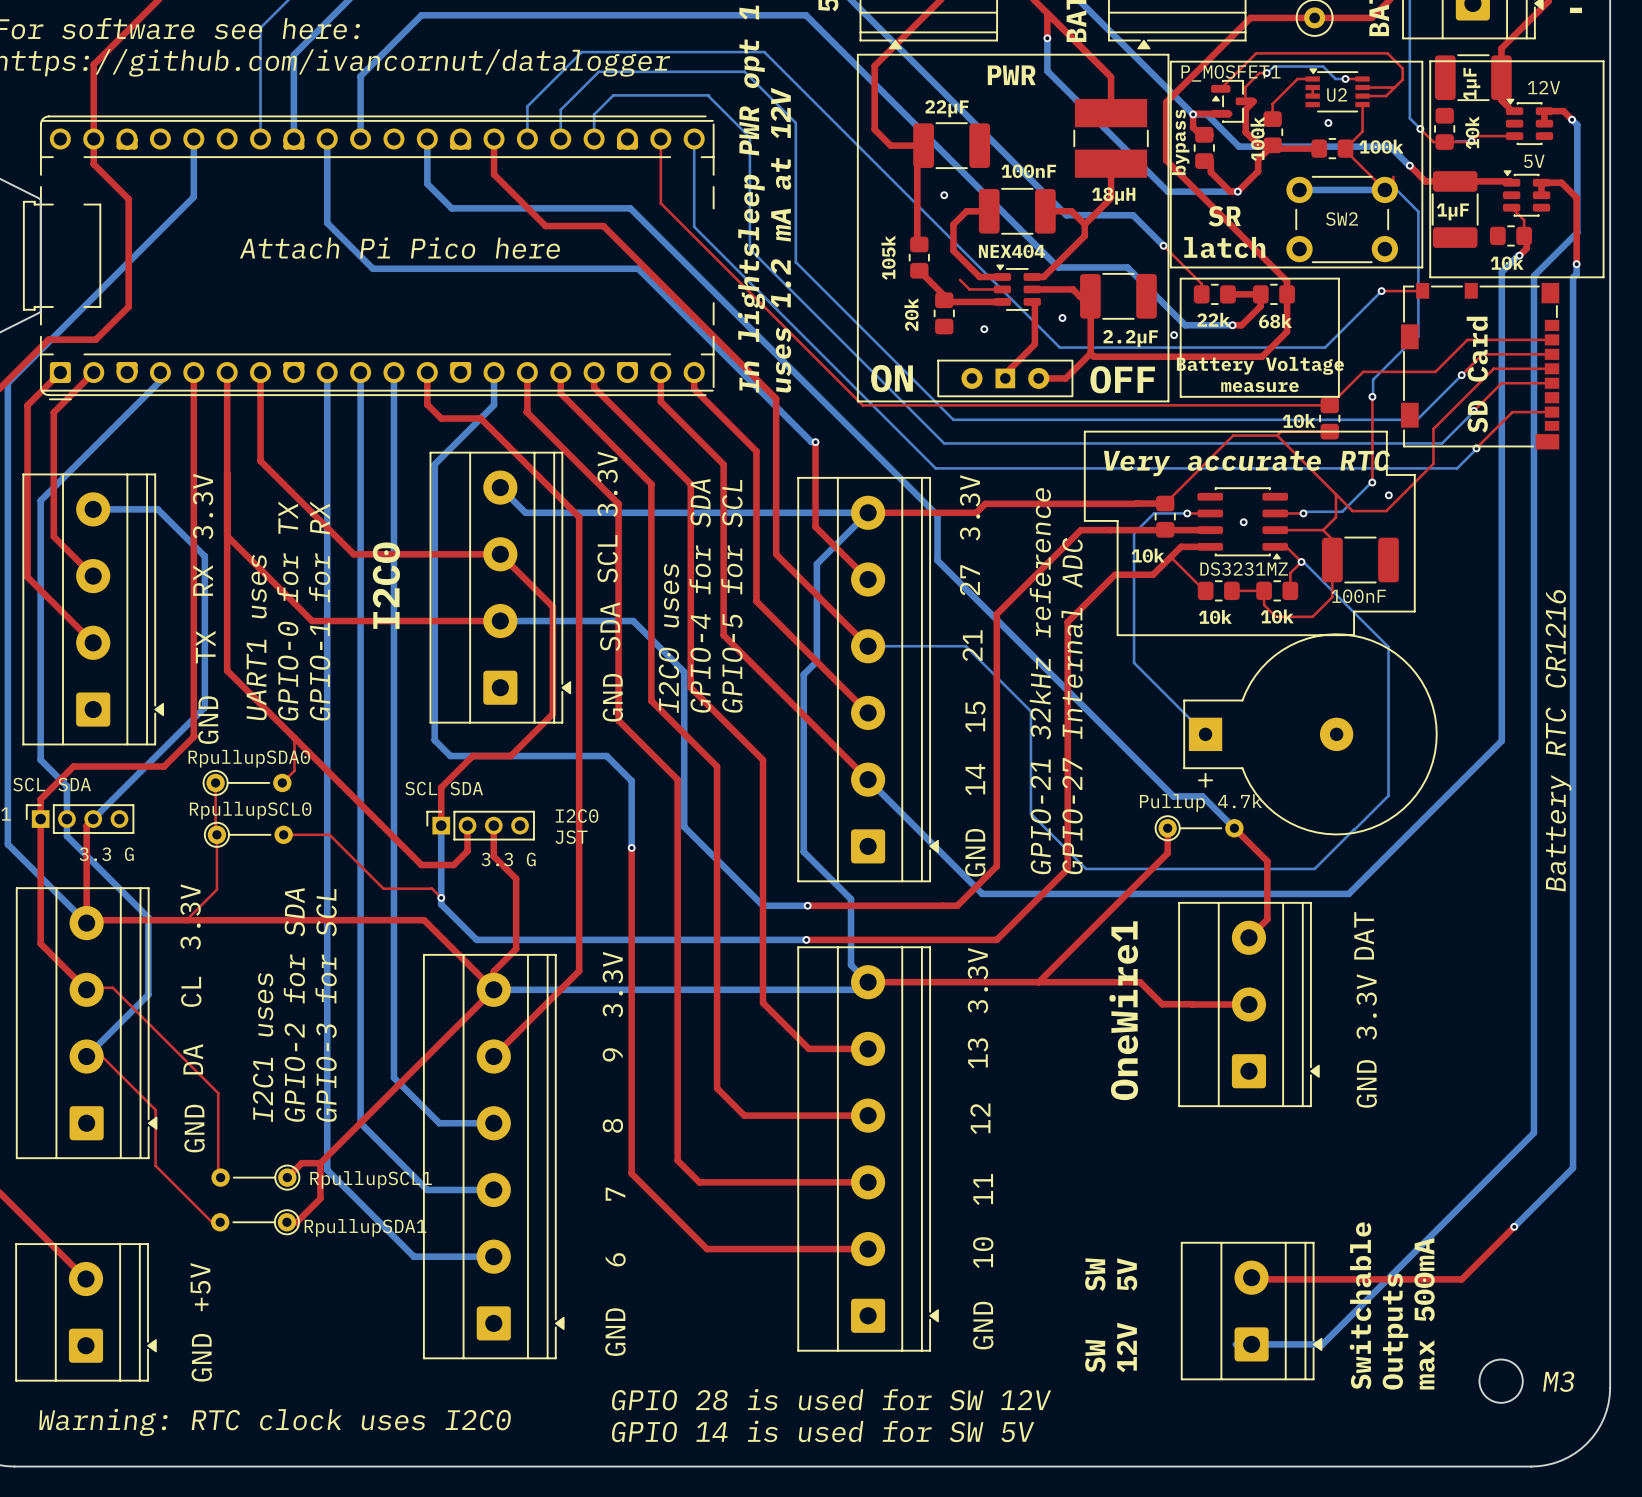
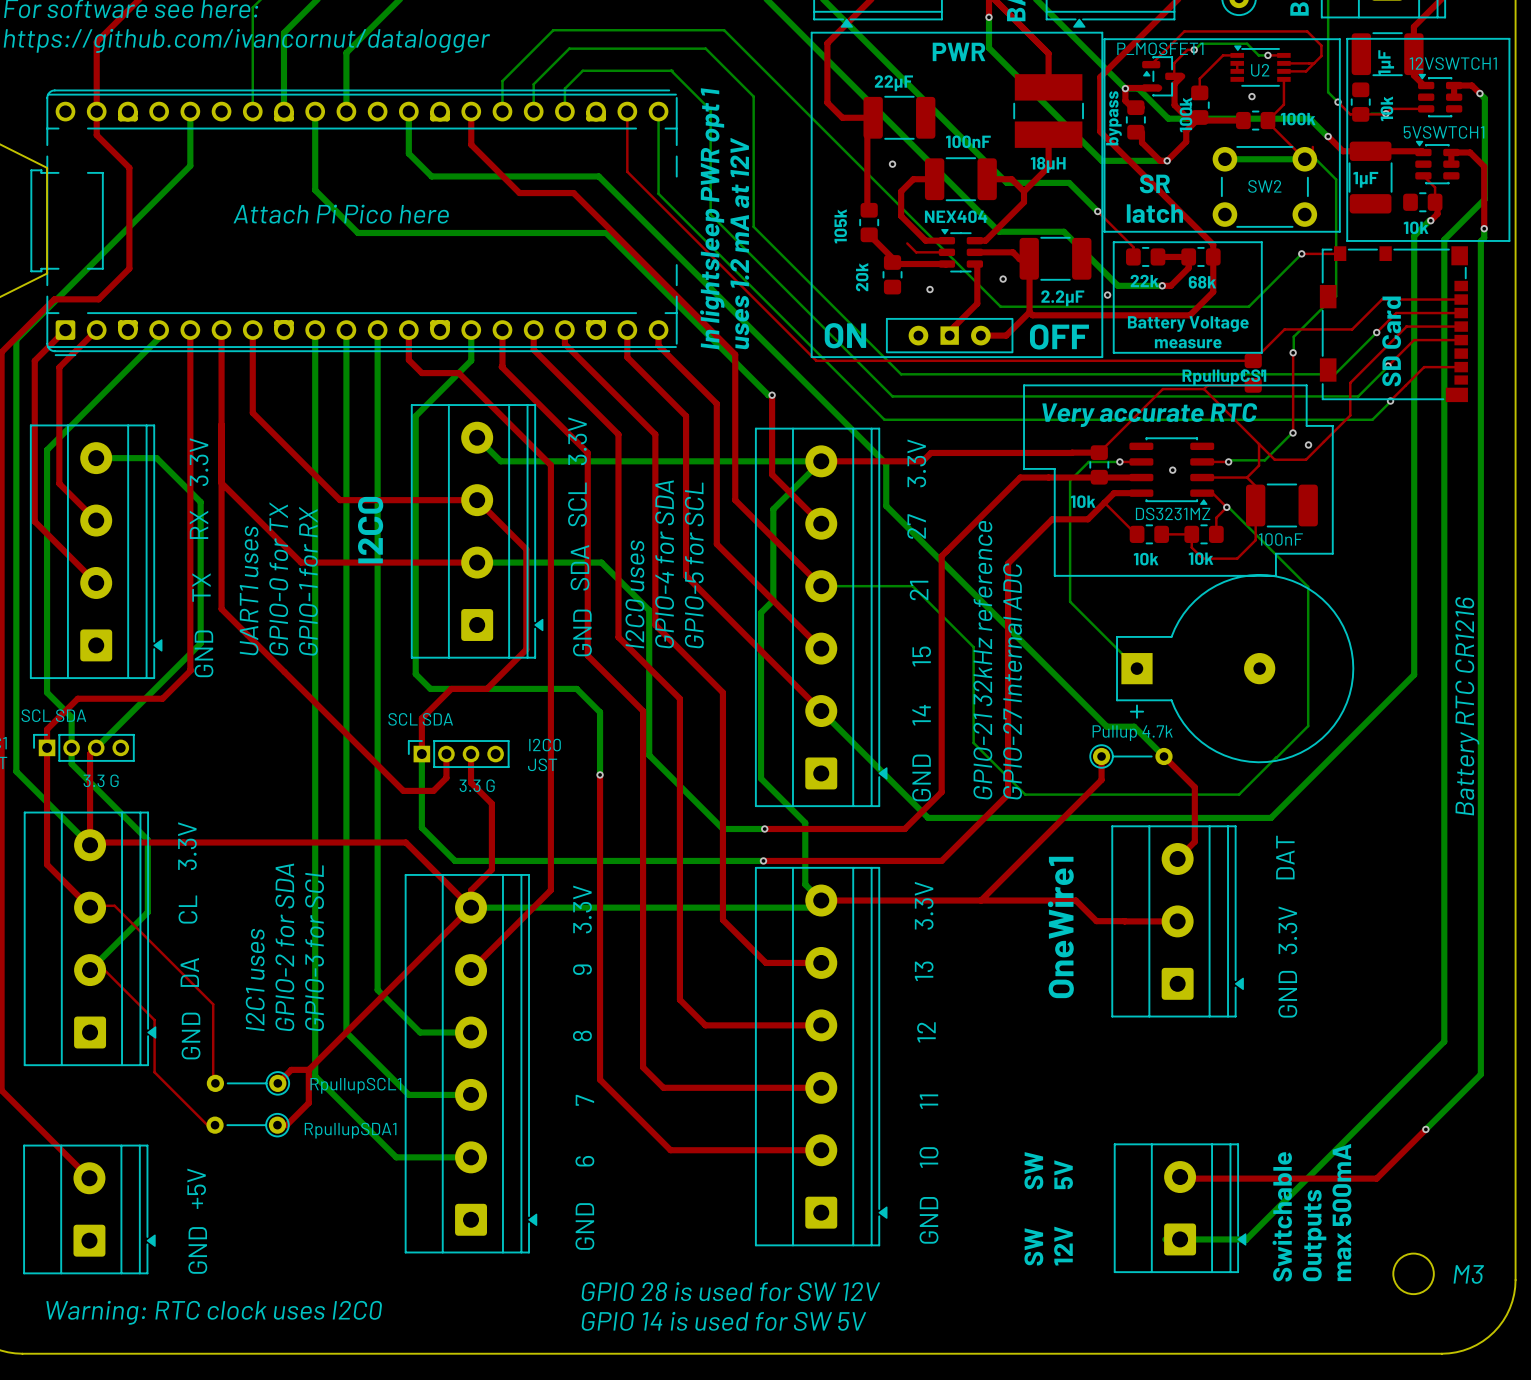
12V name: 12V (1543, 87) -> 12VSWTCH1 (1453, 63)
5V name: 5V (1534, 161) -> 5VSWTCH1 (1444, 132)
10k name: 10k (1299, 421) -> RpullupCS1 (1224, 377)
top track: (294, 737) (294, 770) (282, 782) -> none
top track: (215, 782) (216, 889) (186, 920) -> none
RpullupSDA0: (247, 782) -> none
RpullupSCL0: (248, 834) -> none
top track: (283, 834) (329, 834) (383, 888) (432, 888) (441, 897) -> none
via: (441, 897) -> none

